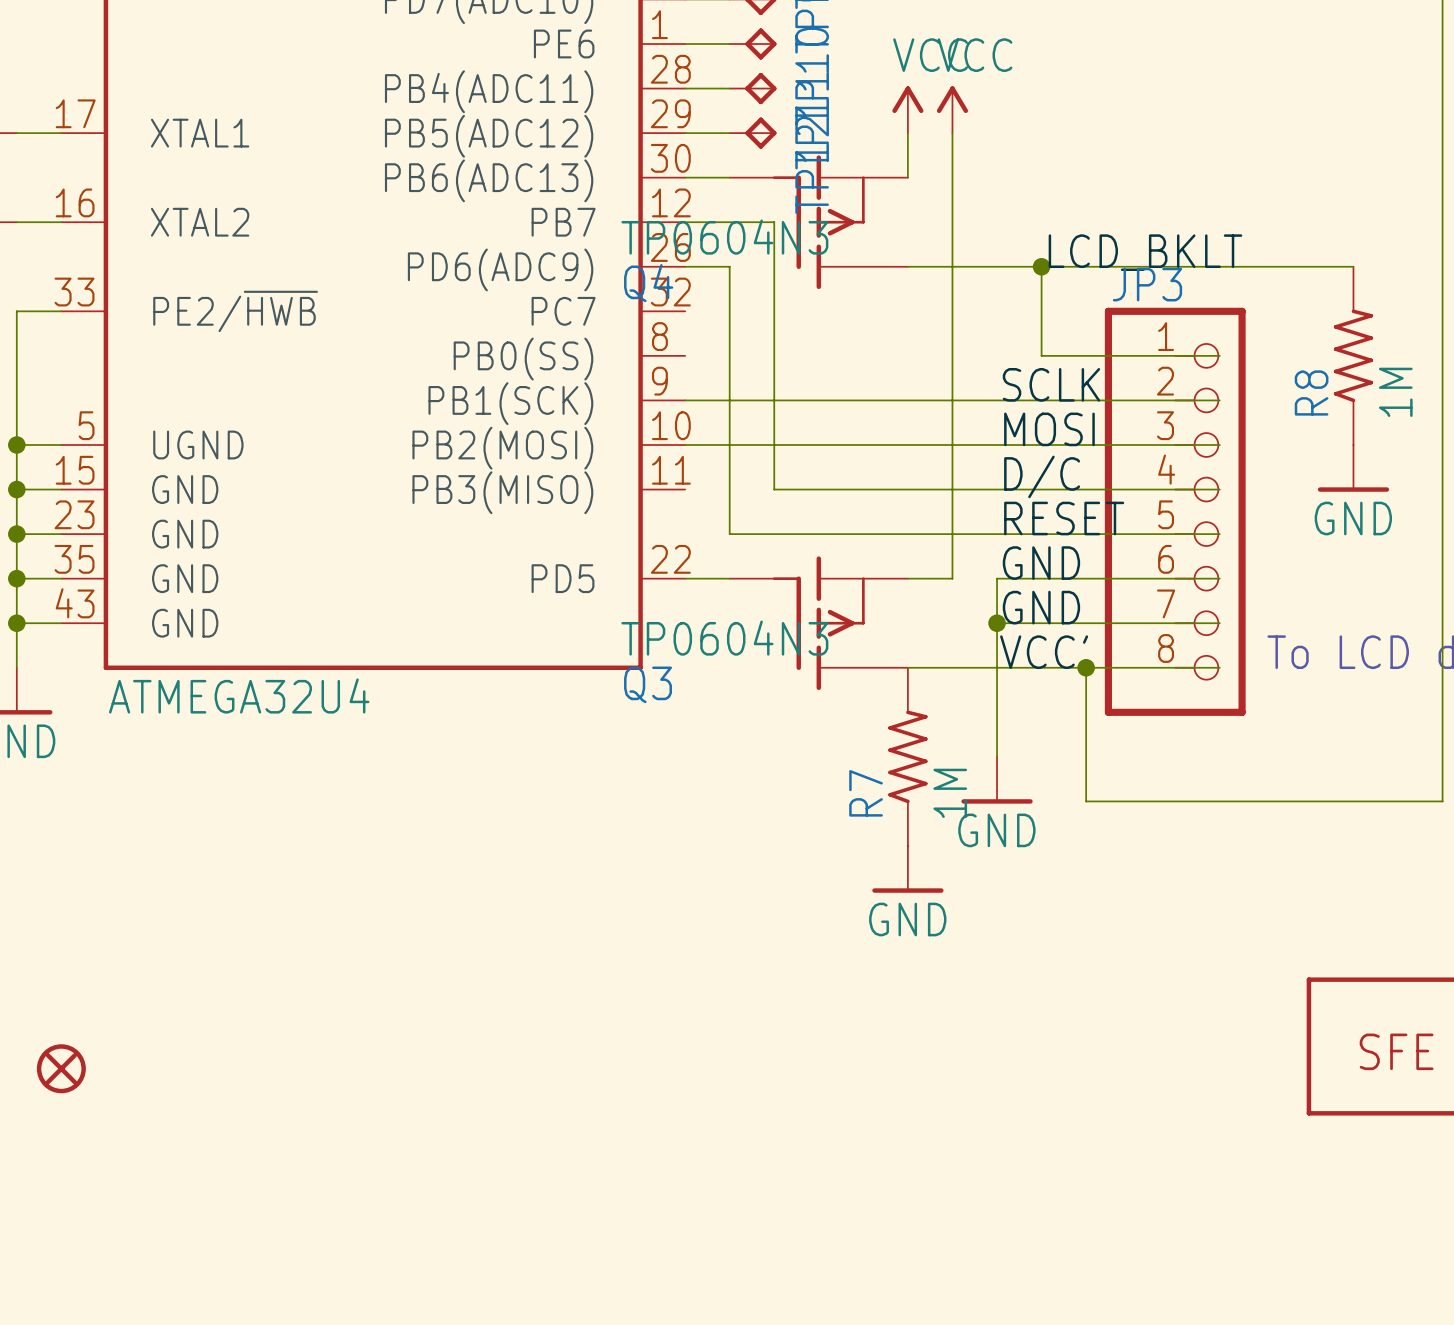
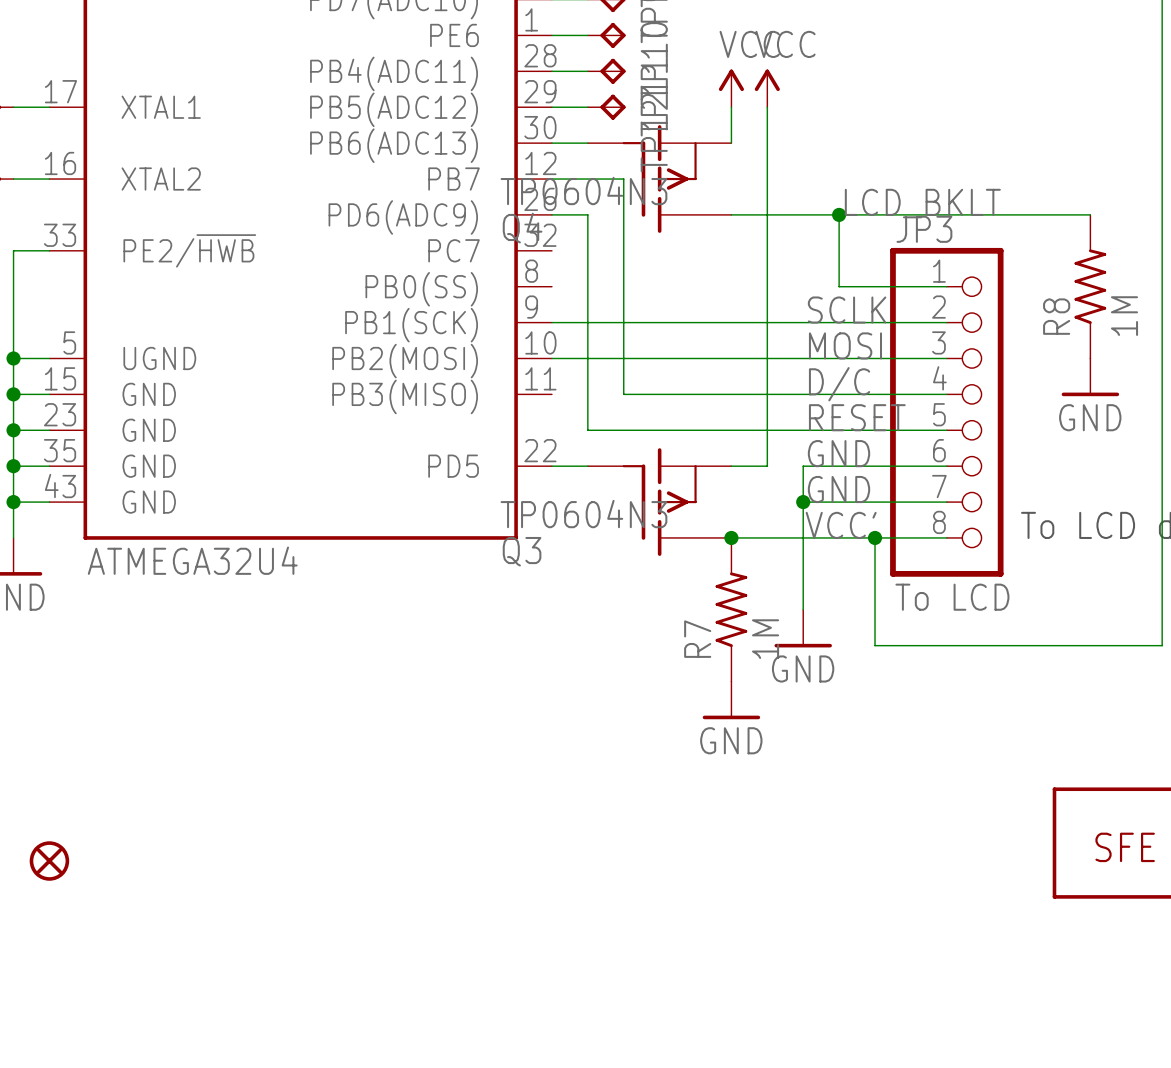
wire: (1175, 355) (1219, 355) -> none
wire: (1175, 400) (1219, 400) -> none
wire: (1175, 444) (1219, 444) -> none
wire: (1175, 489) (1219, 489) -> none
wire: (1175, 534) (1219, 534) -> none
wire: (1175, 578) (1219, 578) -> none
wire: (1175, 623) (1219, 623) -> none
junction: none -> (731, 537)
wire: (1175, 667) (1219, 667) -> none
JP3 value: none -> To LCD (952, 597)

